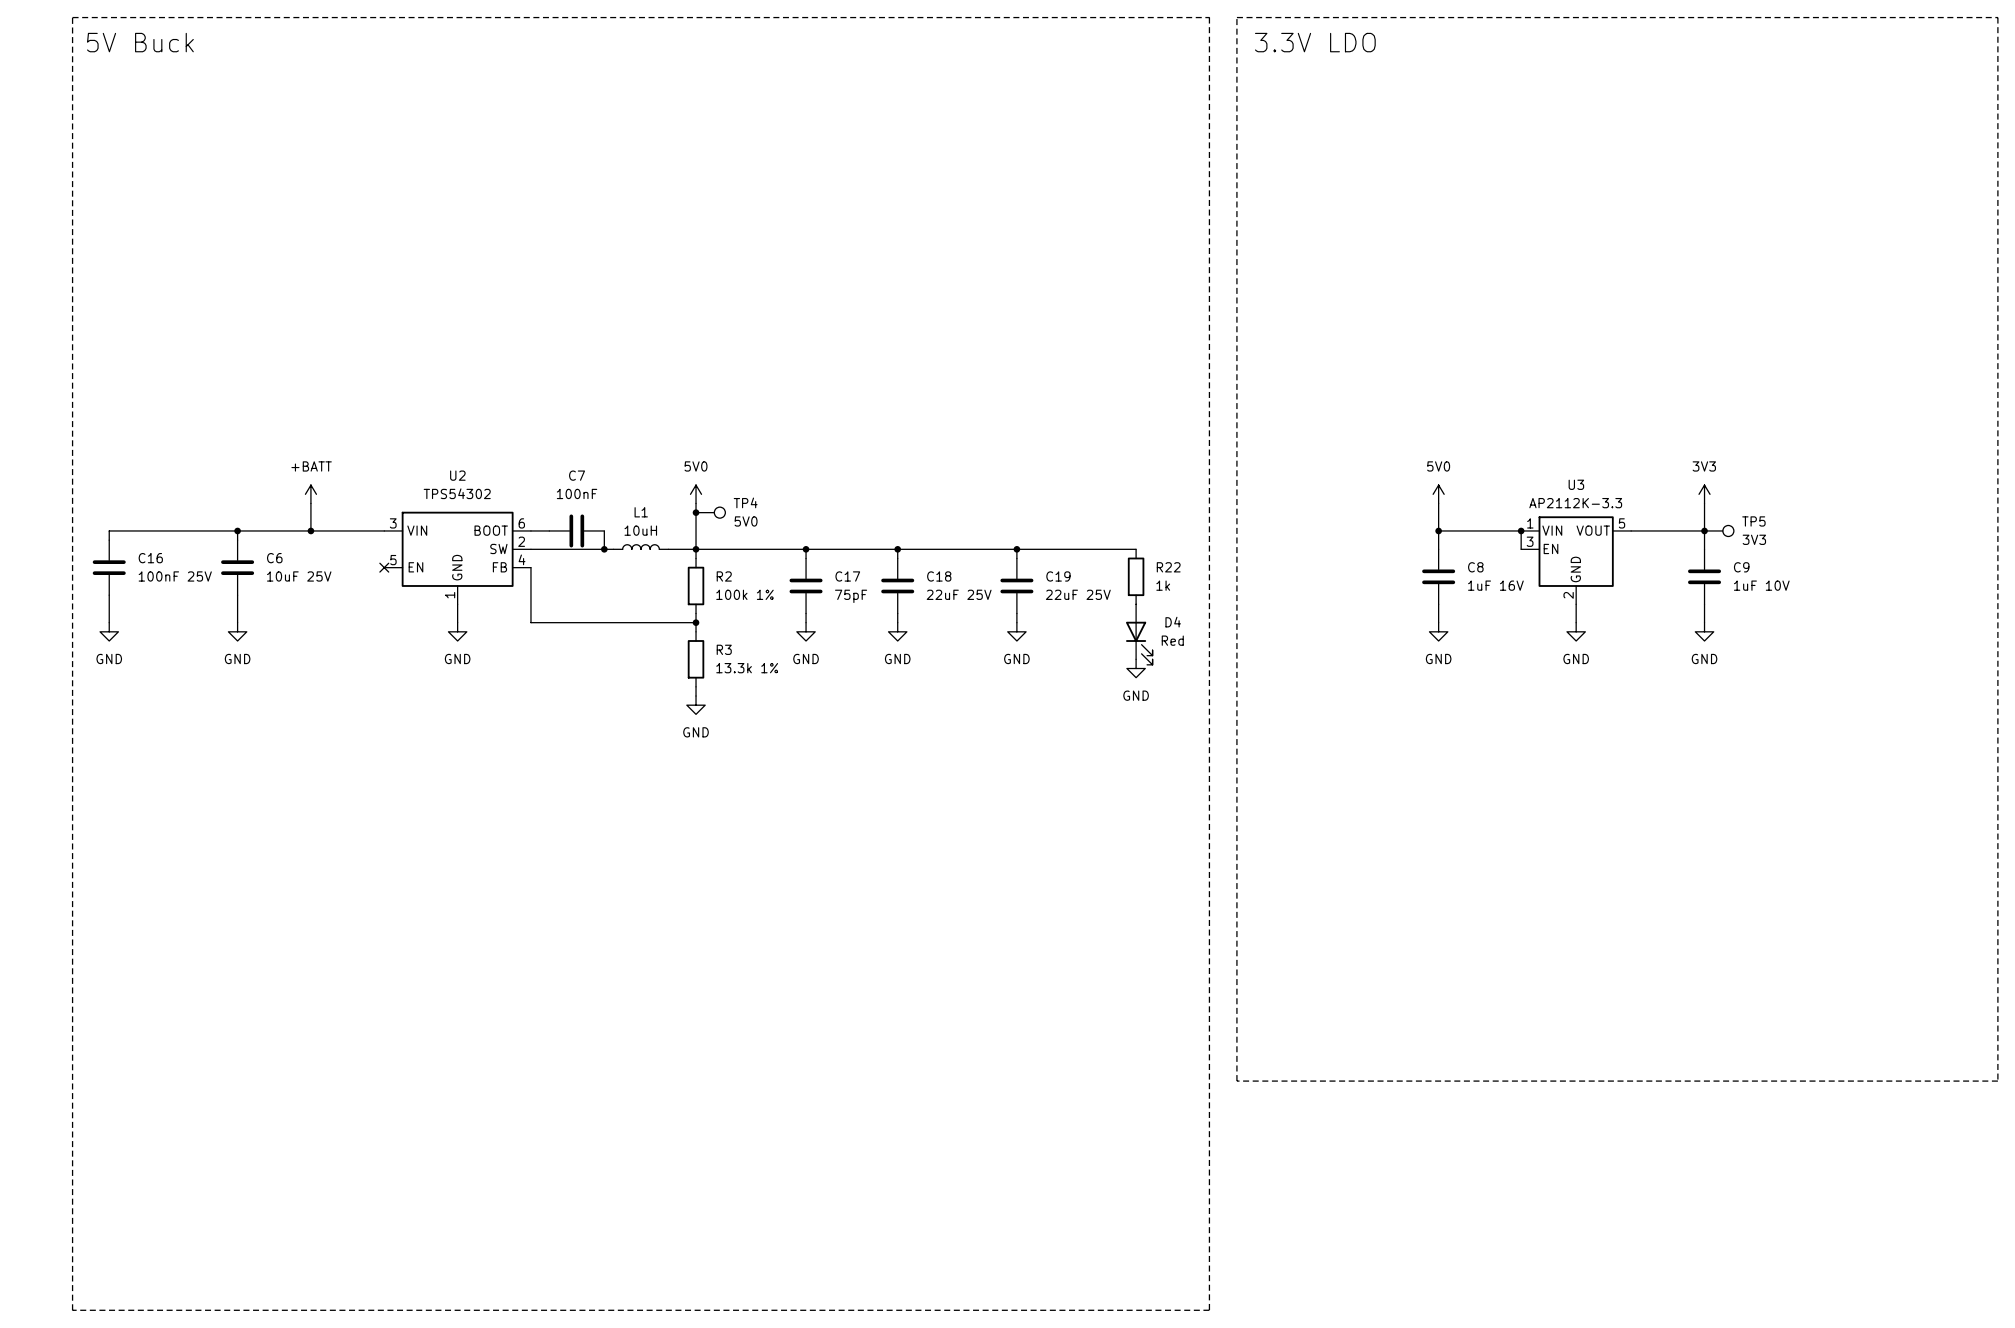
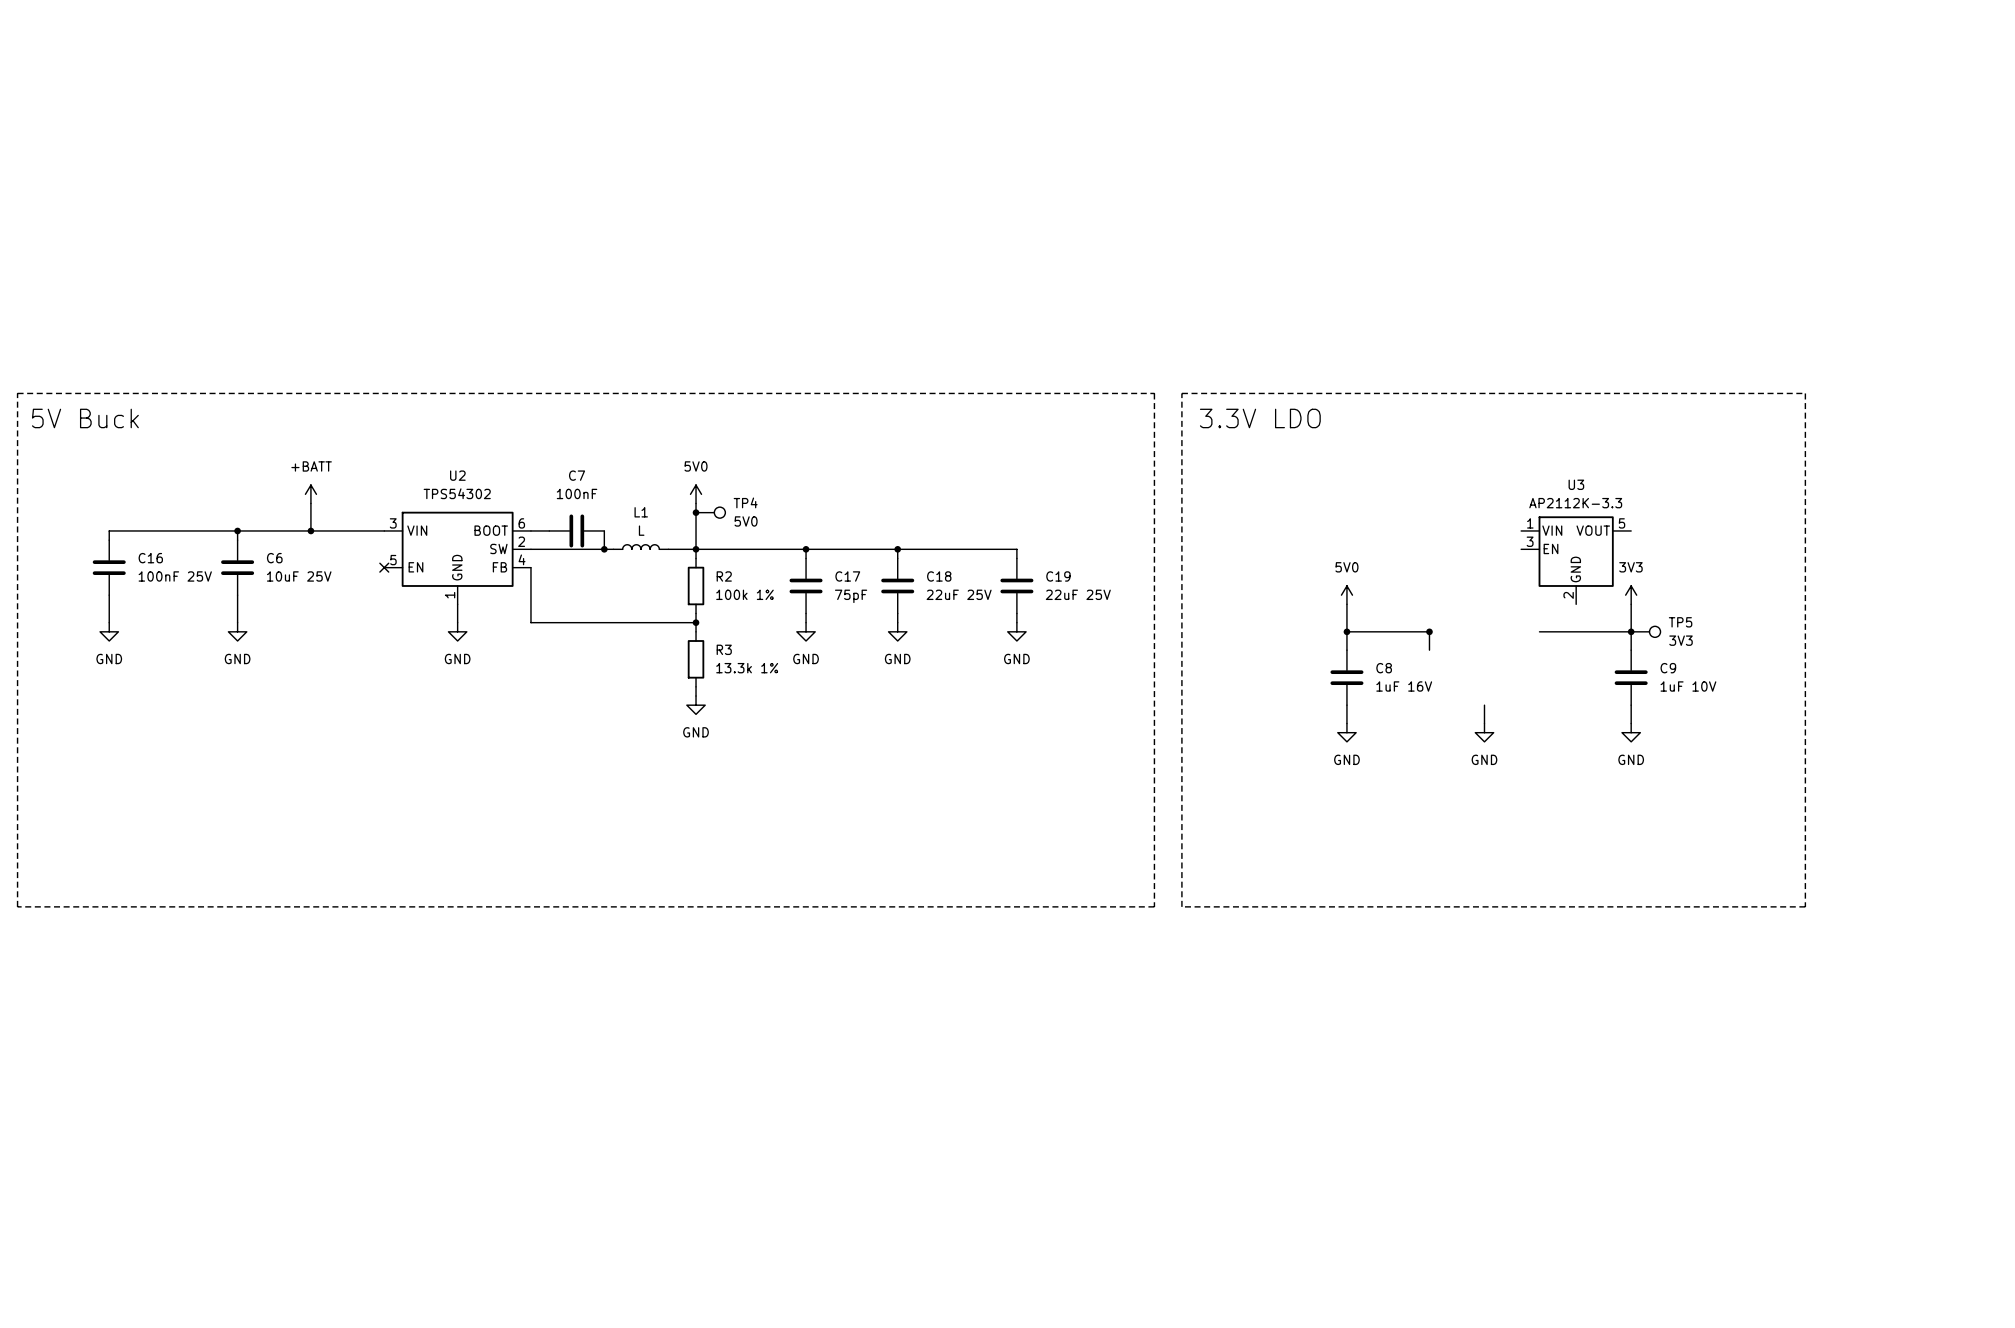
line: (72, 17) (1209, 17) (1209, 1310) (72, 1310) (72, 17) -> none
line: (1236, 17) (1997, 17) (1997, 1081) (1236, 1081) (1236, 17) -> none
text: 5V Buck (140, 42) -> none
text: 3.3V LDO (1315, 42) -> none
line: none -> (17, 393) (1154, 393) (1154, 906) (17, 906) (17, 393)
line: none -> (1181, 393) (1805, 393) (1805, 906) (1181, 906) (1181, 393)
text: none -> 5V Buck (85, 418)
text: none -> 3.3V LDO (1260, 418)
power symbol position: 5V0 (1438, 494) -> 5V0 (1346, 595)
power symbol position: 3V3 (1704, 494) -> 3V3 (1631, 595)
wire: (1438, 503) (1438, 549) -> (1346, 604) (1346, 650)
wire: (1704, 503) (1704, 549) -> (1631, 604) (1631, 650)
L1 value: 10uH (640, 530) -> L (641, 530)
wire: (1438, 530) (1521, 530) (1521, 549) -> (1346, 631) (1429, 631) (1429, 650)
junction: (1438, 530) -> none
junction: (1521, 530) -> none
wire: (1631, 530) (1704, 530) -> none
junction: (1704, 530) -> none
TP5 position: (1719, 530) -> (1645, 631)
wire: (1016, 549) (1136, 549) -> none
junction: (1016, 549) -> none
R22: 1k (1136, 576) -> none
C8 position: (1438, 576) -> (1346, 677)
C9 position: (1704, 576) -> (1631, 677)
wire: (1438, 604) (1438, 622) -> (1346, 705) (1346, 723)
wire: (1576, 604) (1576, 622) -> (1484, 705) (1484, 723)
wire: (1704, 604) (1704, 622) -> (1631, 705) (1631, 723)
junction: none -> (1346, 631)
junction: none -> (1429, 631)
power symbol: GND (1438, 631) -> none
wire: none -> (1539, 631) (1631, 631)
power symbol: GND (1576, 631) -> none
junction: none -> (1631, 631)
power symbol: GND (1704, 631) -> none
D4: Red (1139, 634) -> none
power symbol: GND (1136, 668) -> none
power symbol: none -> GND (1346, 732)
power symbol: none -> GND (1484, 732)
power symbol: none -> GND (1631, 732)

